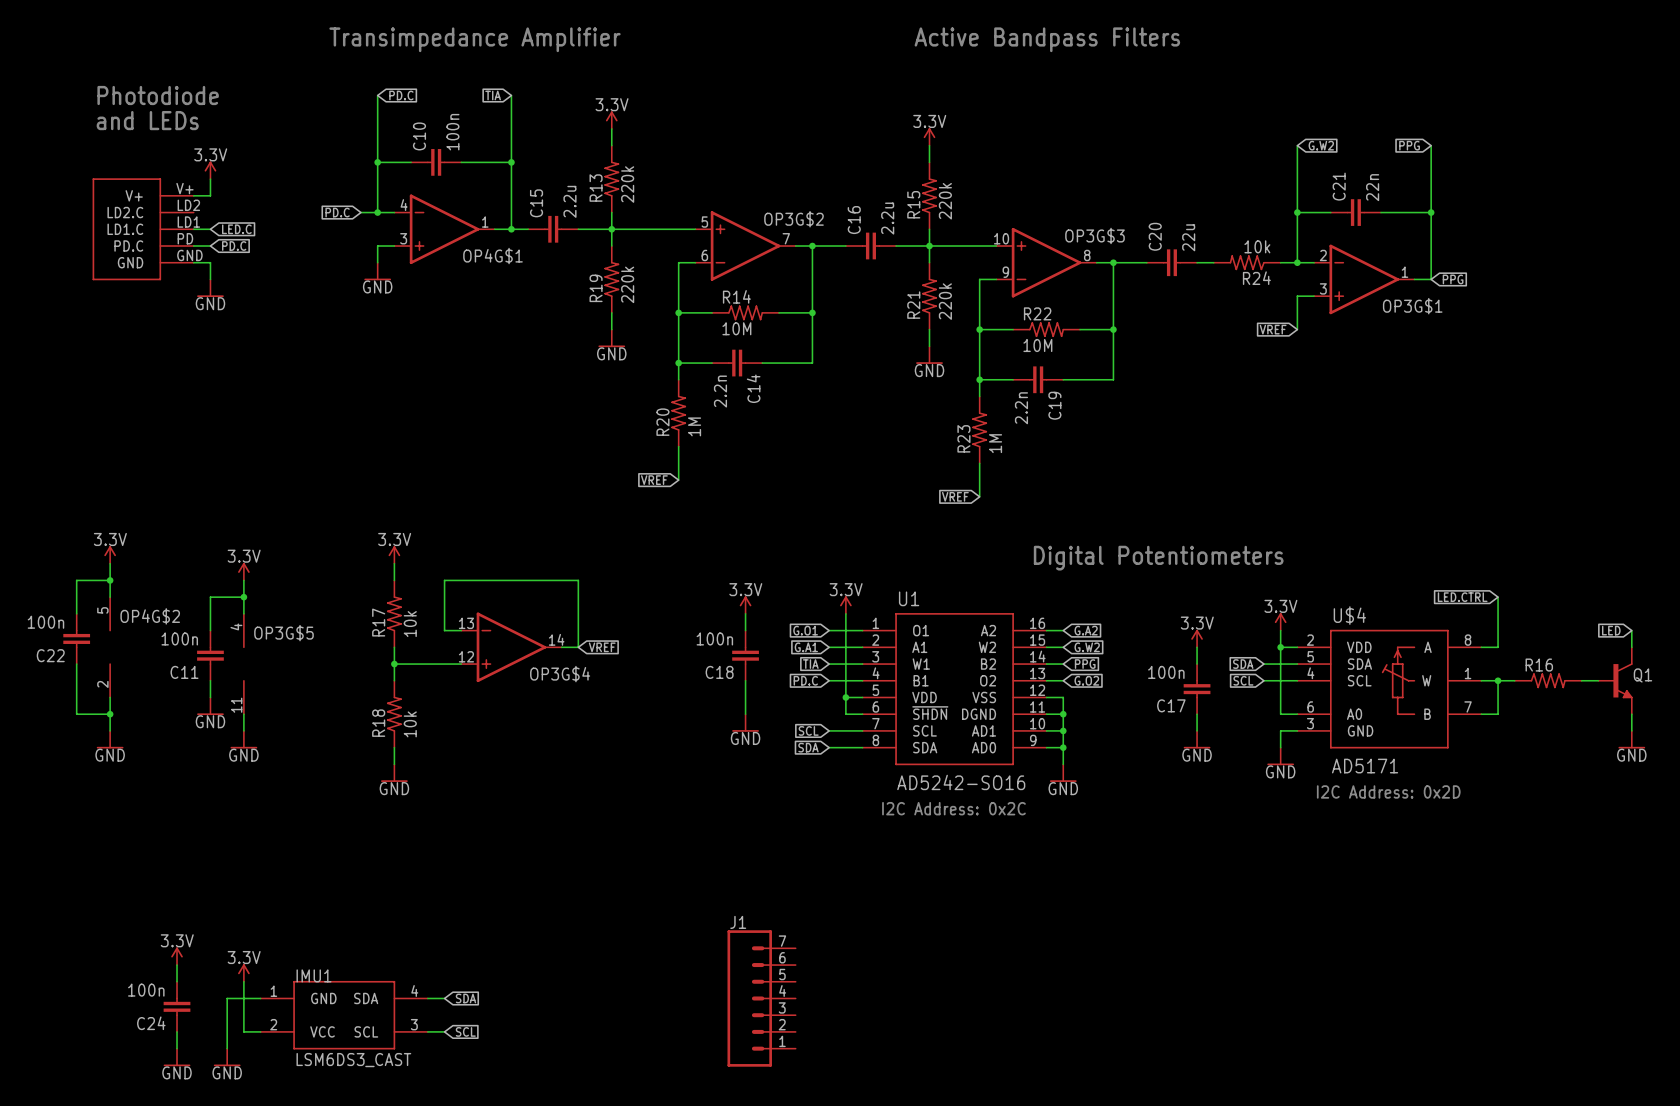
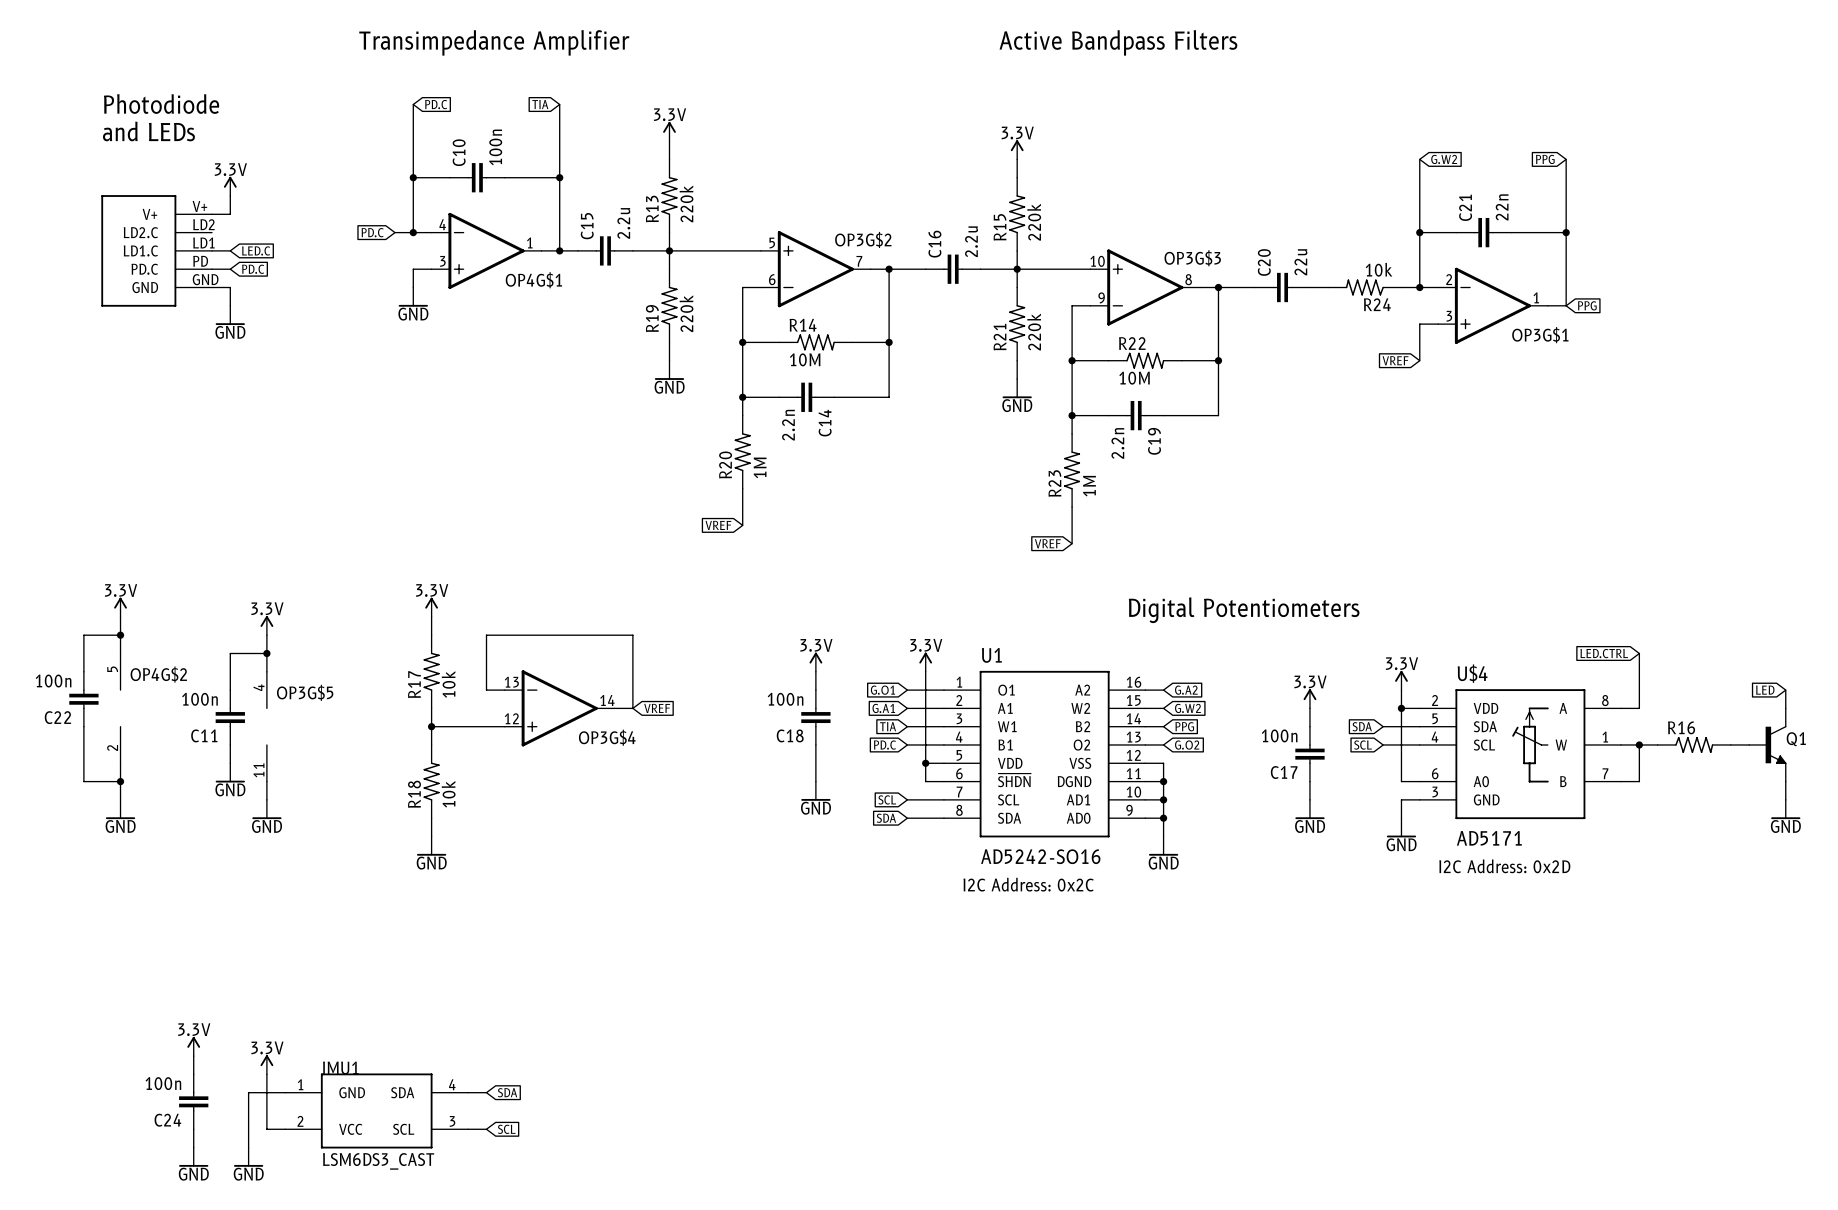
J1: (761, 998) -> none

